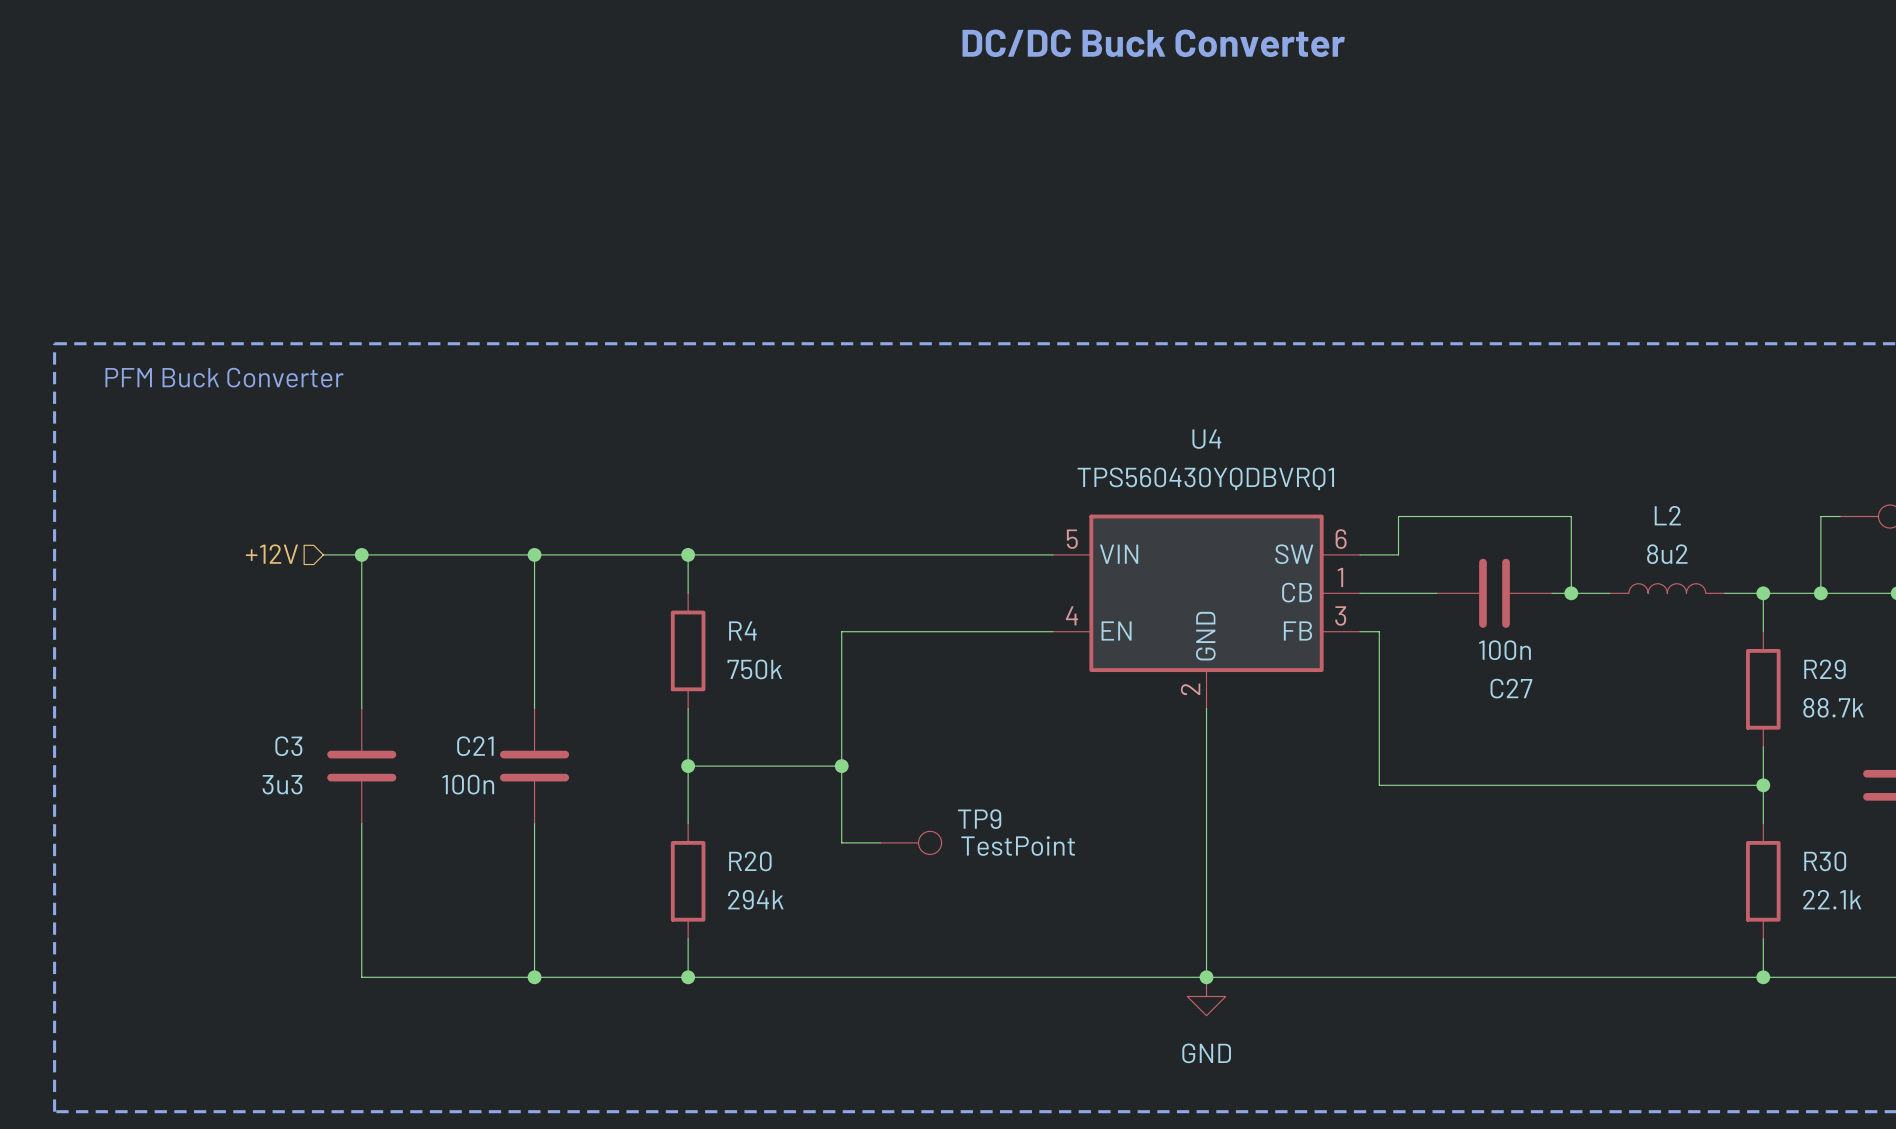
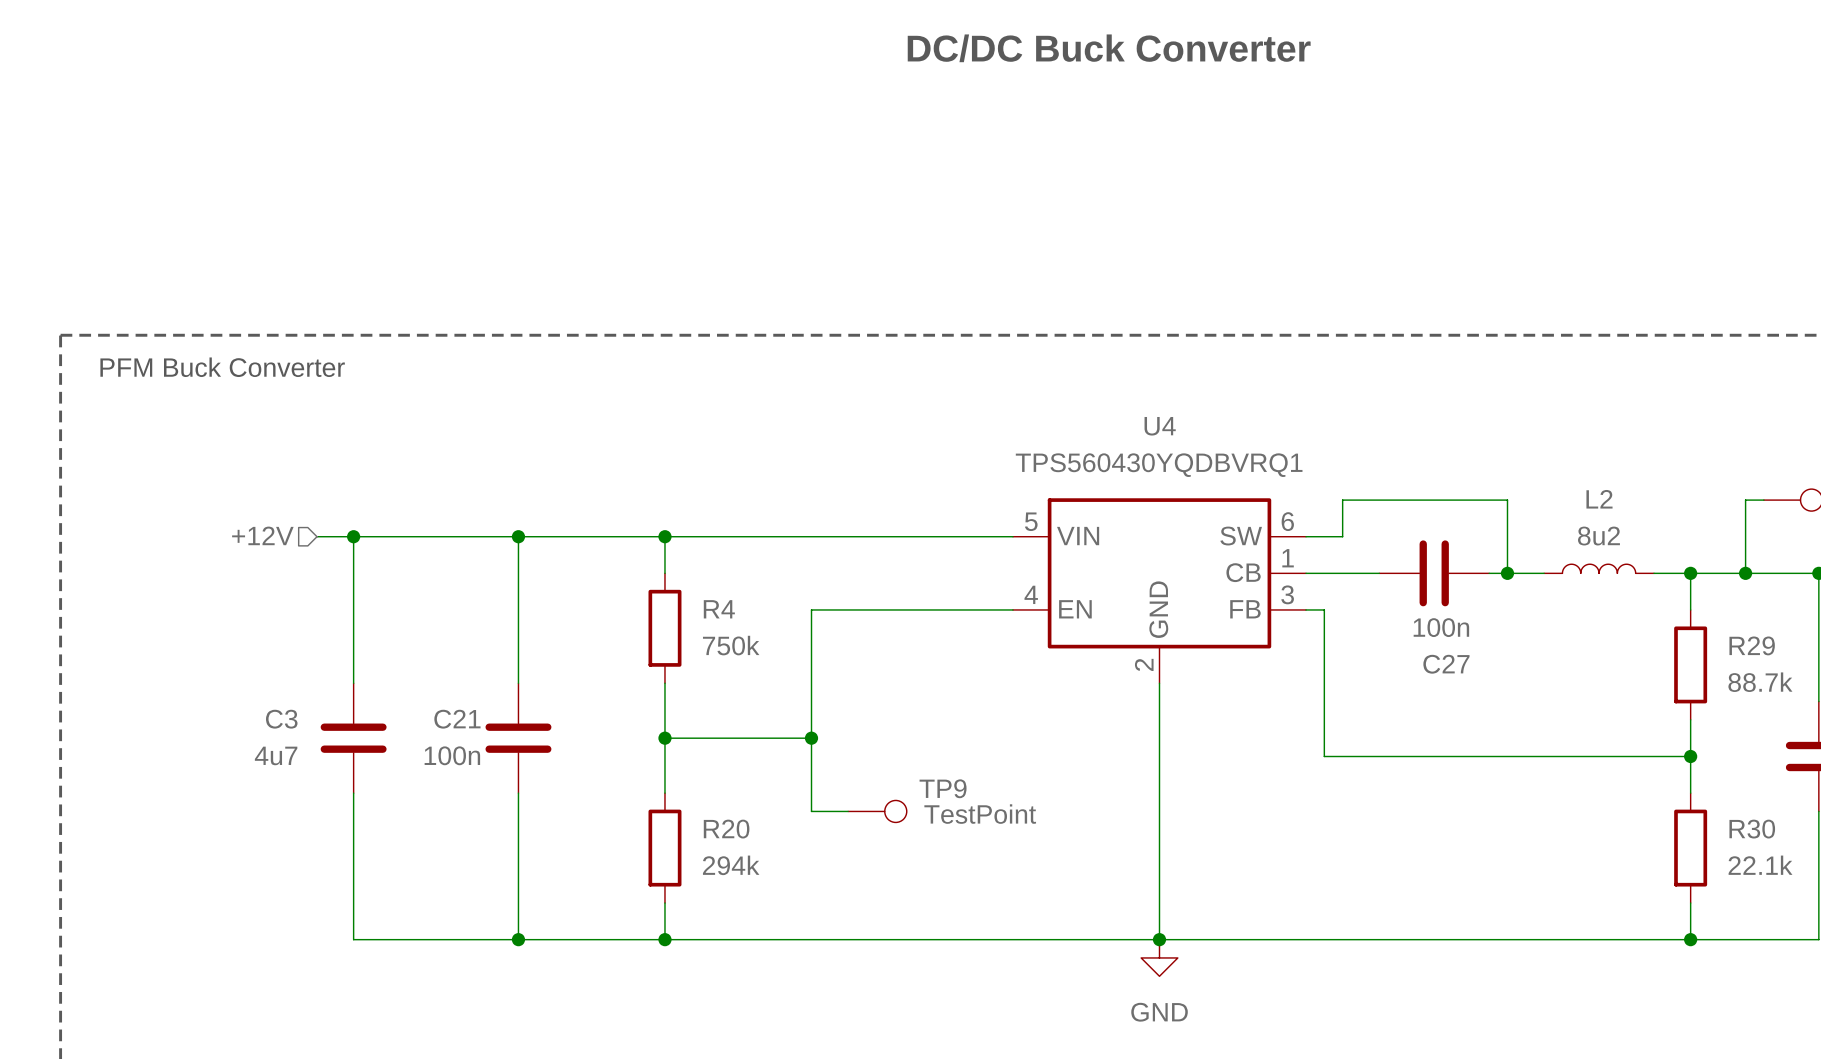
C3 value: 3u3 (282, 784) -> 4u7 (276, 755)

